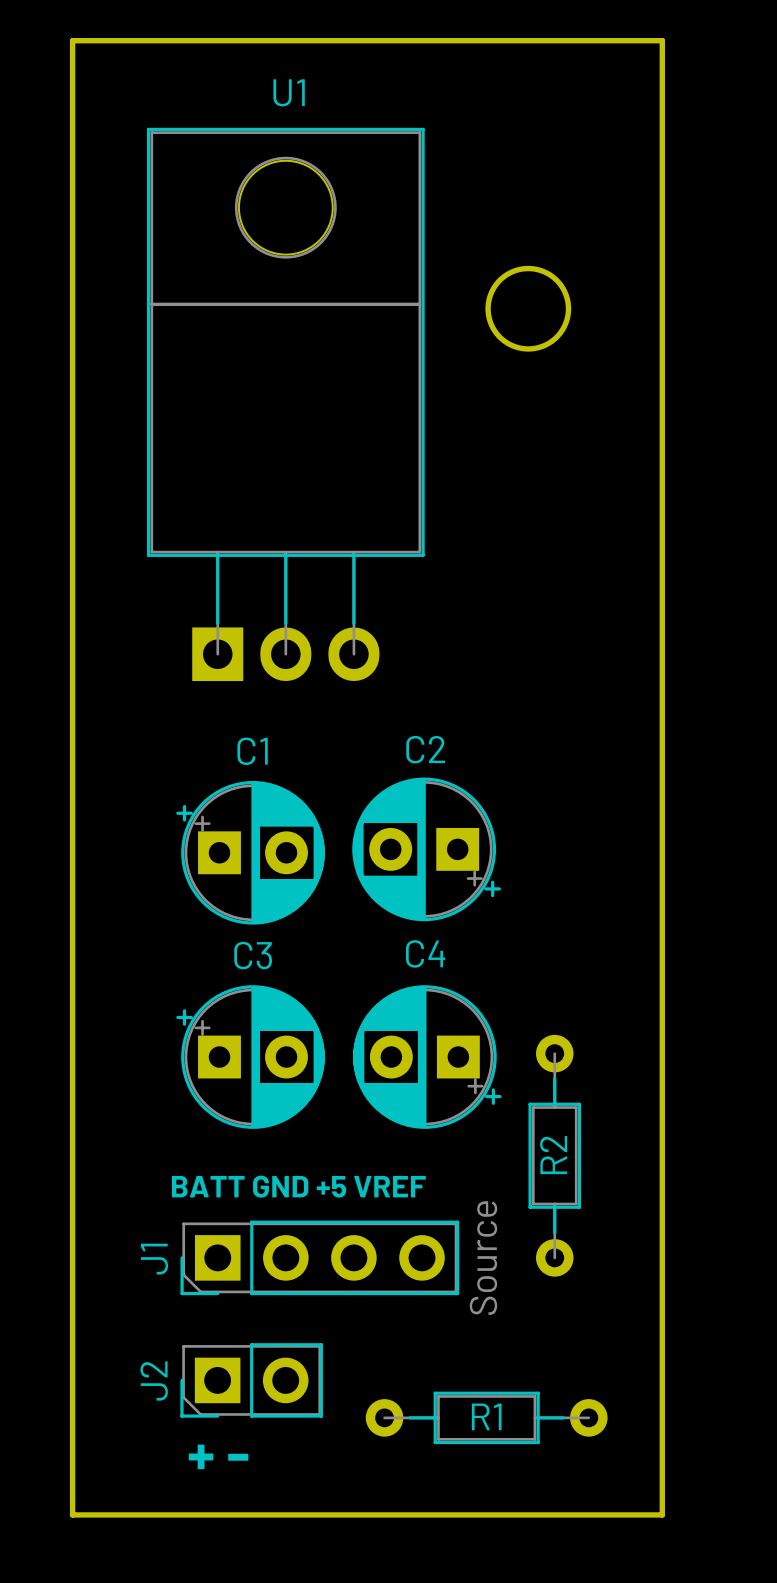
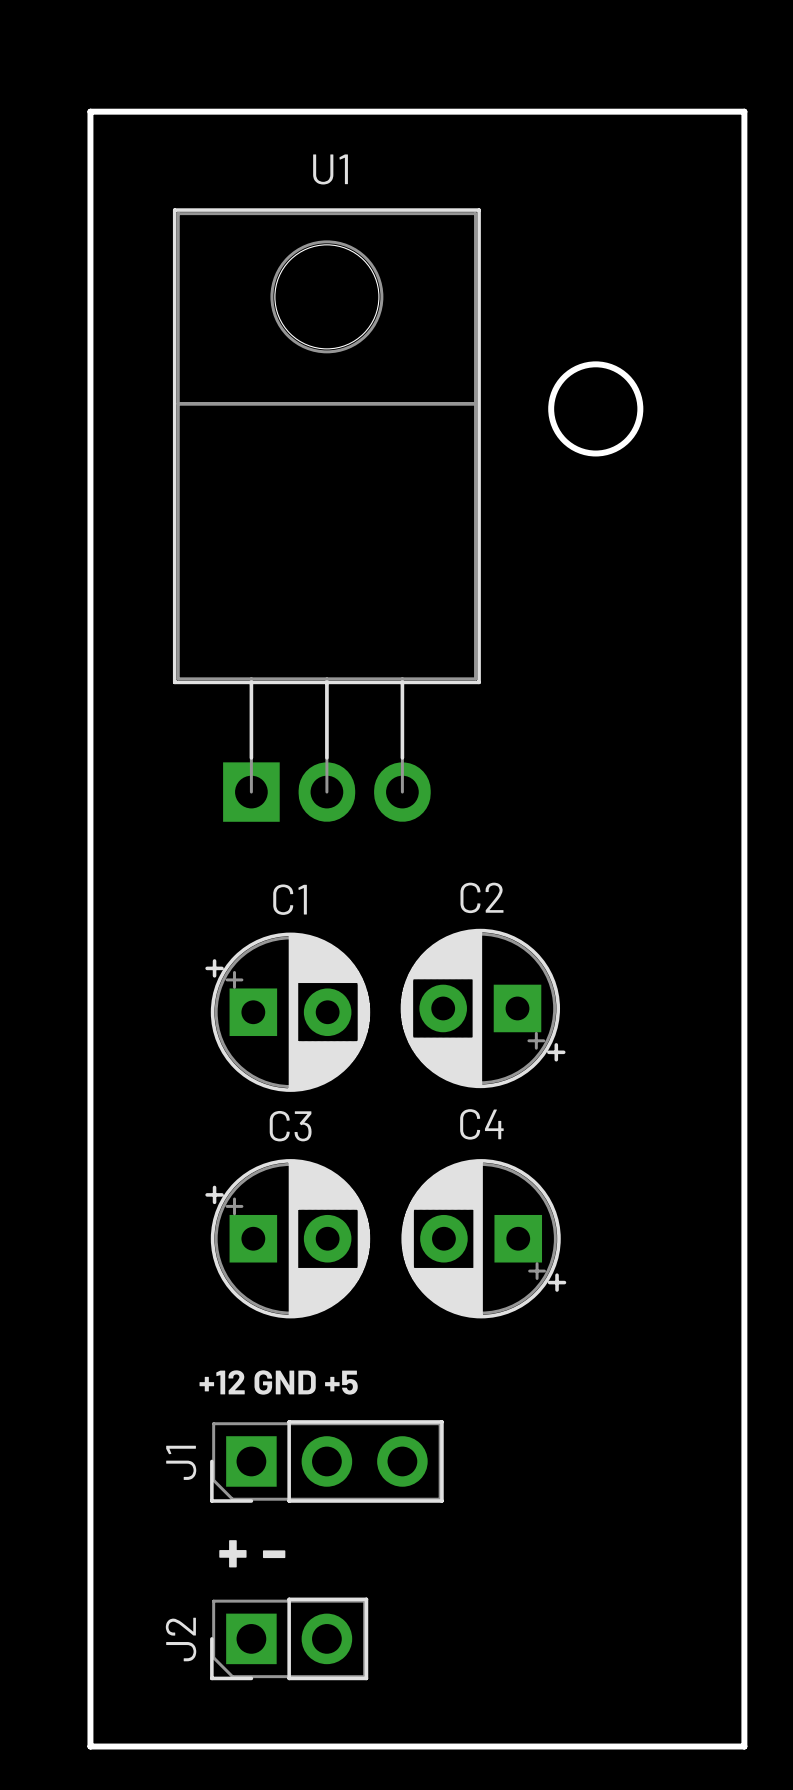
R2: (554, 1155) -> none
text: BATT GND +5 VREF (298, 1186) -> +12 GND +5 (278, 1382)
J1 footprint: [180, 1220, 460, 1296] -> [210, 1420, 444, 1503]
J1 value: Source (483, 1258) -> none
J2 position: (251, 1380) -> (289, 1638)
R1: (486, 1417) -> none
text position: + - (218, 1456) -> + - (252, 1553)

